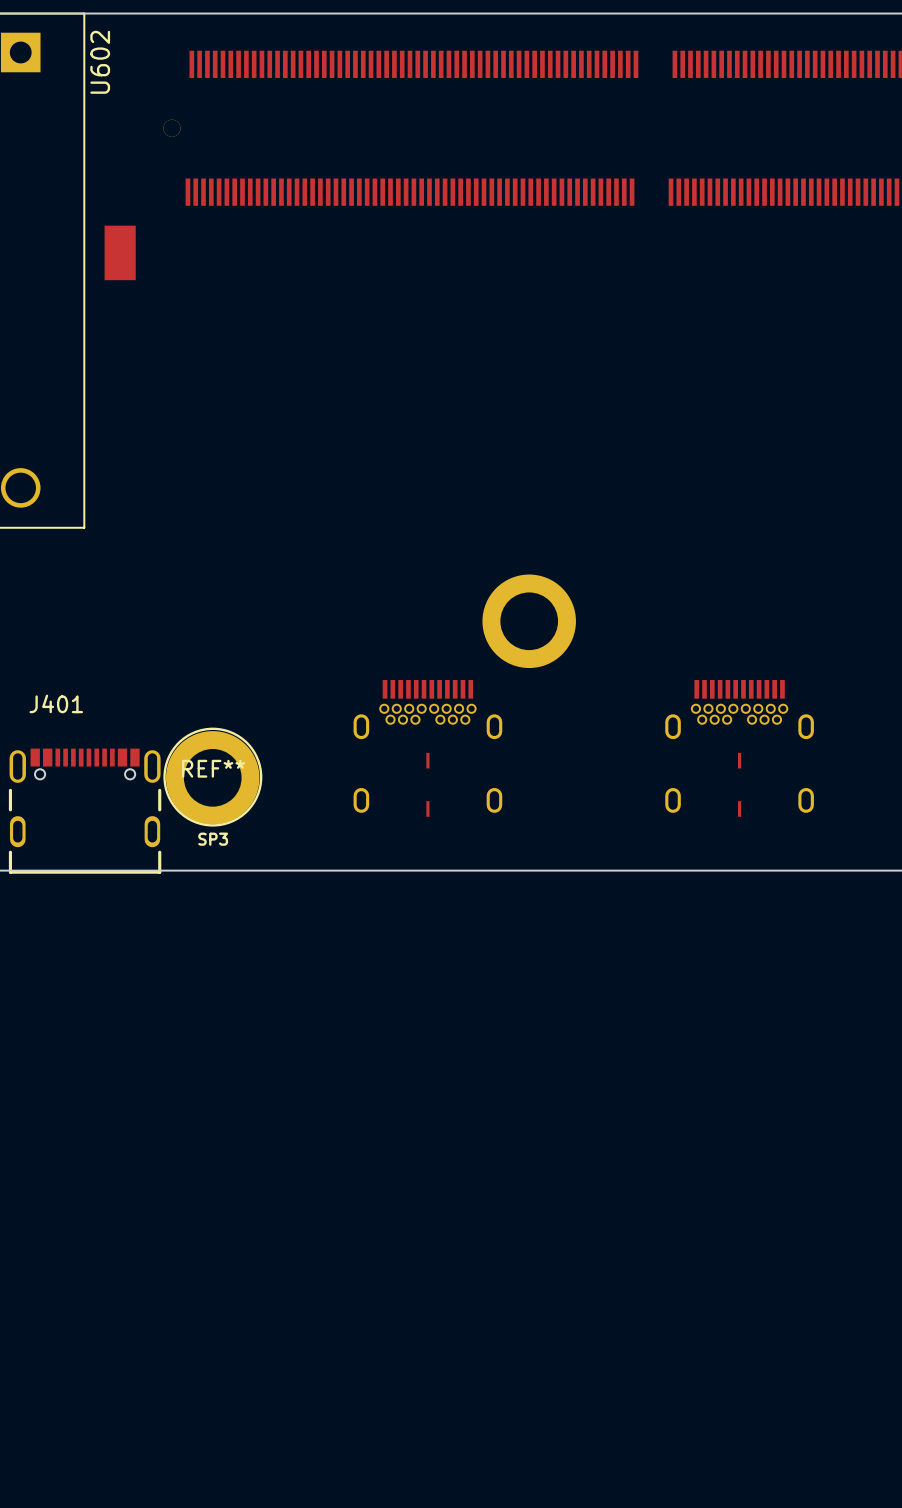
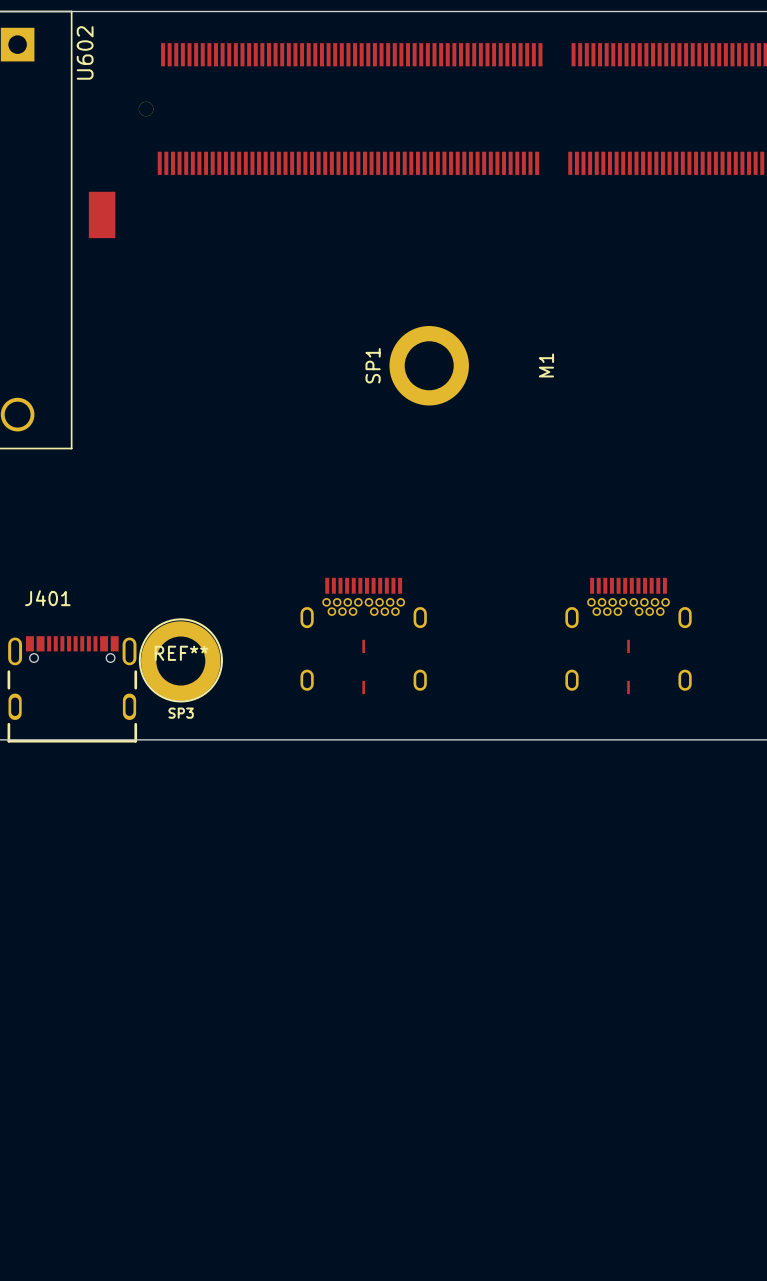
M1: none -> (546, 365)
SP1 position: (529, 621) -> (429, 365)

